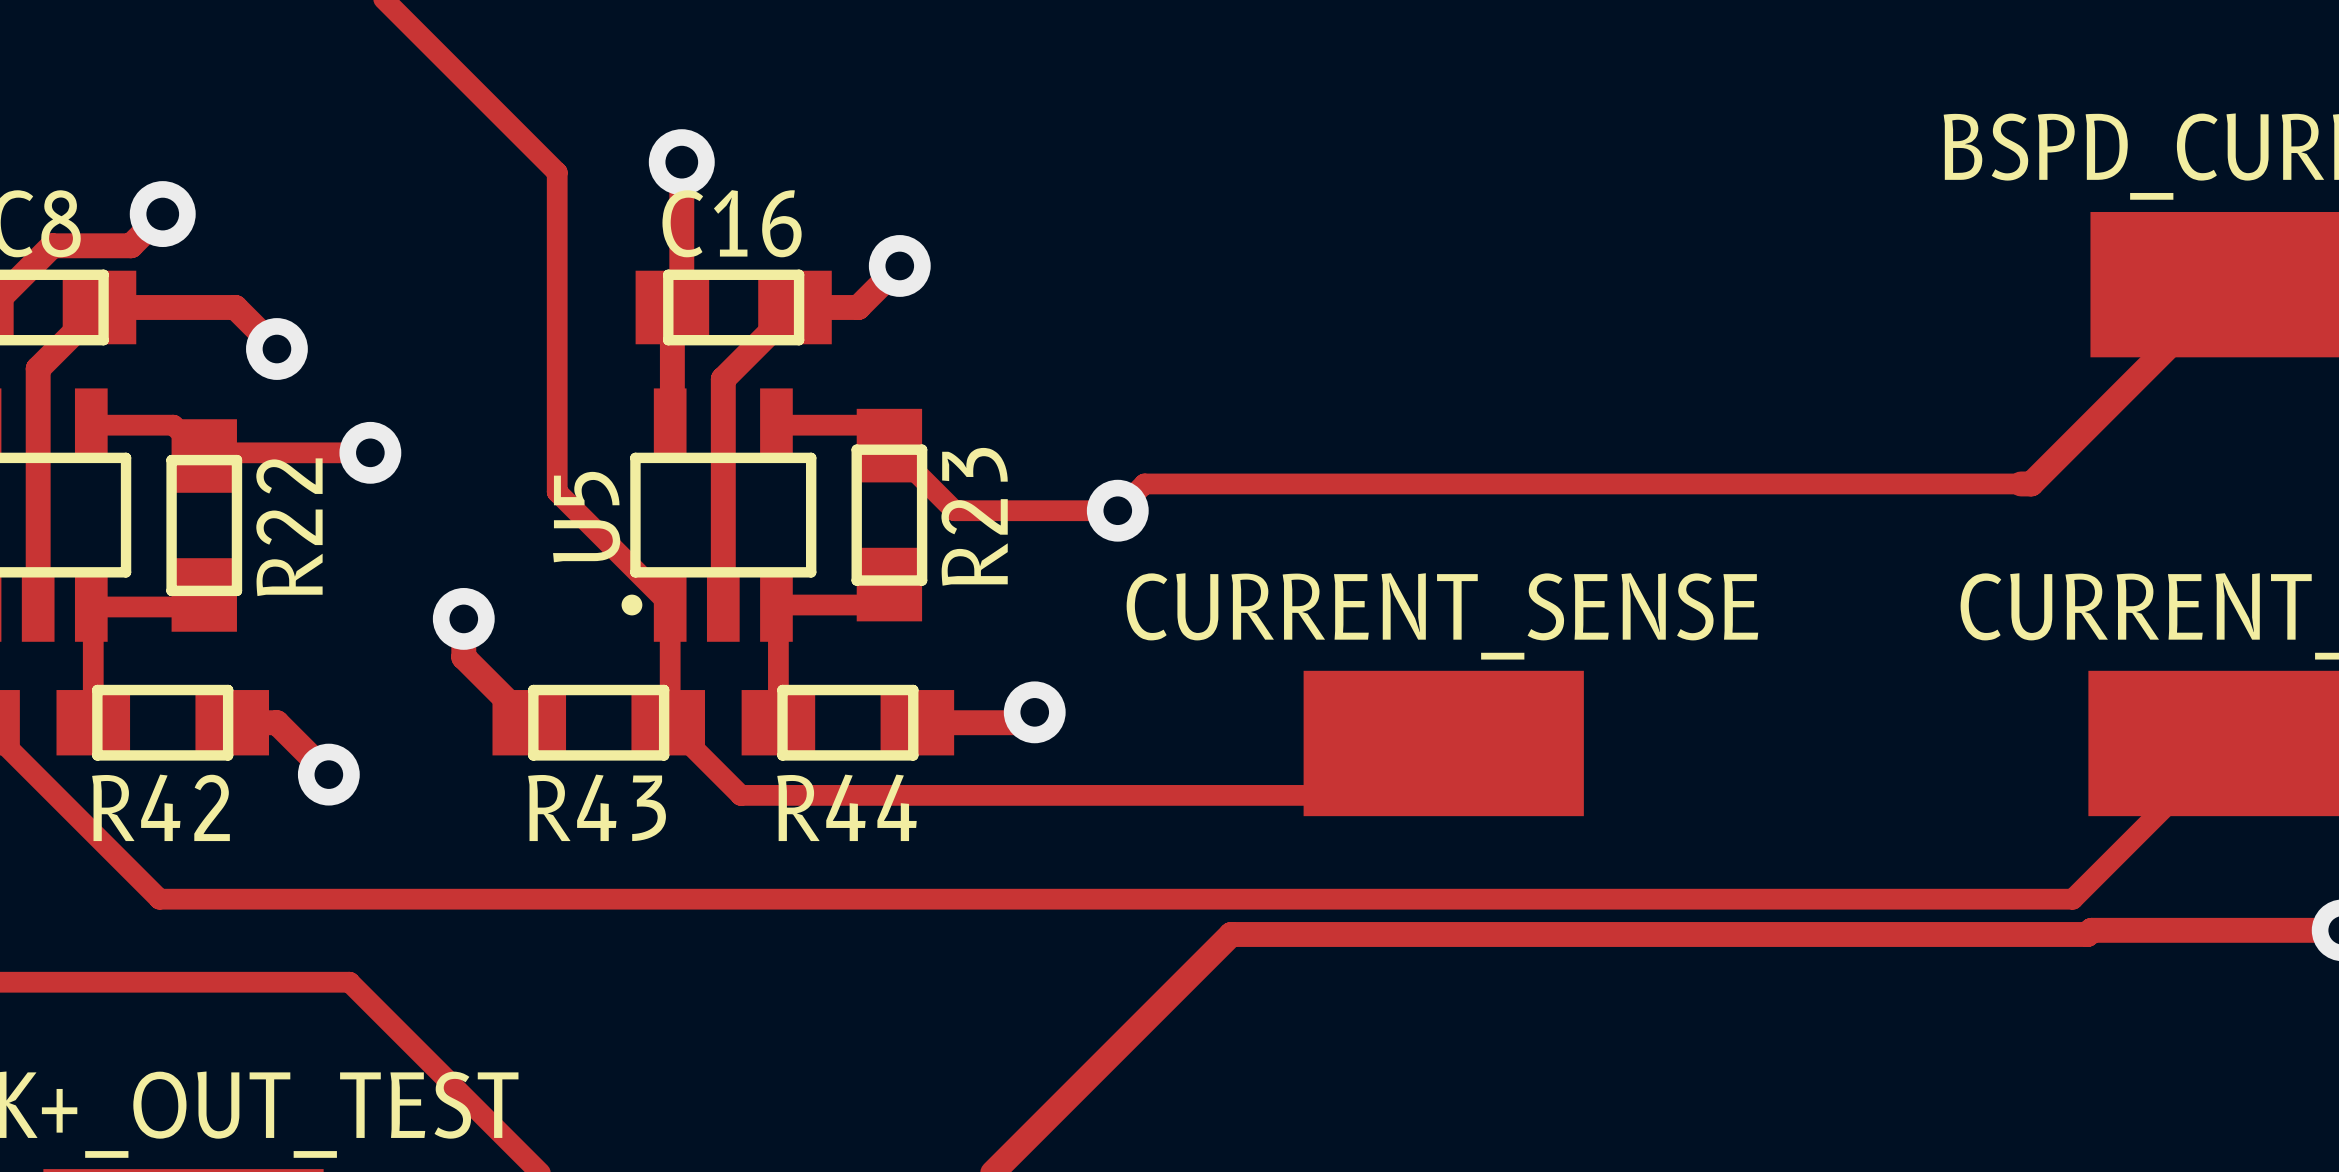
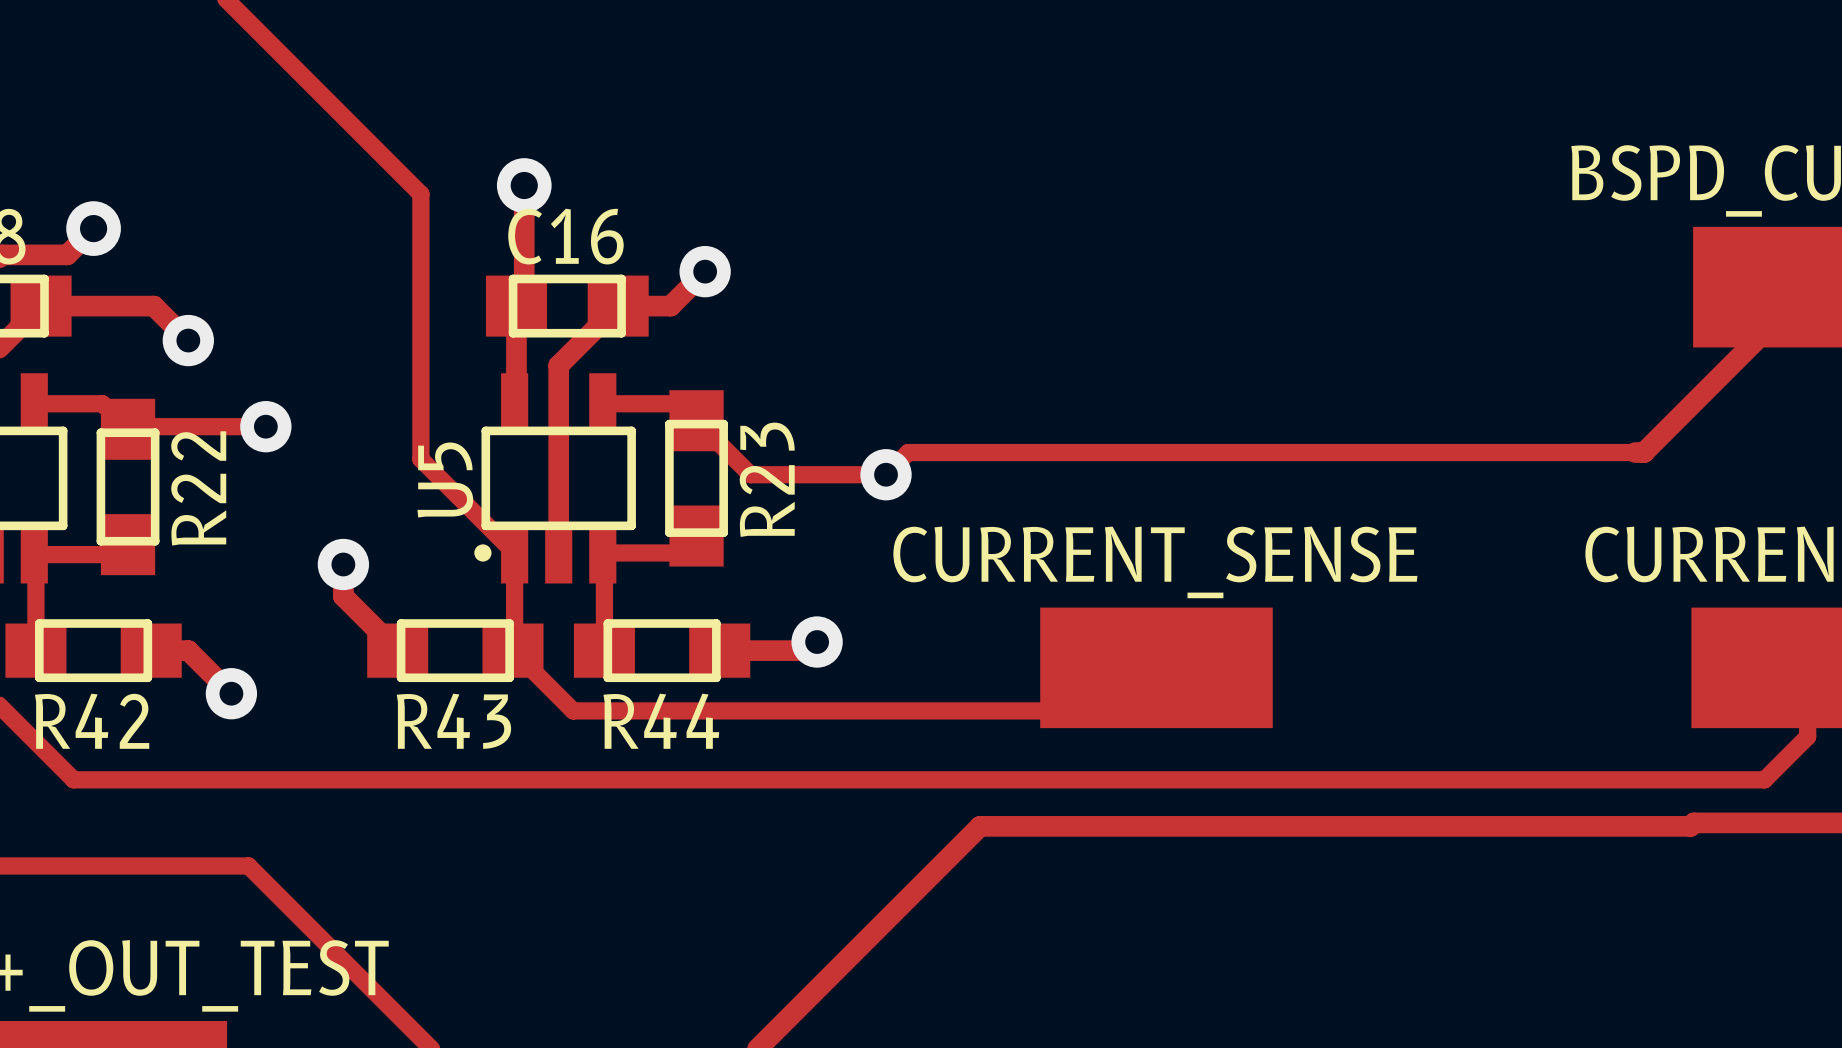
track: (2228, 743) (2072, 899) (159, 899) (138, 878) -> (1807, 667) (1807, 736) (1764, 779) (73, 779)

